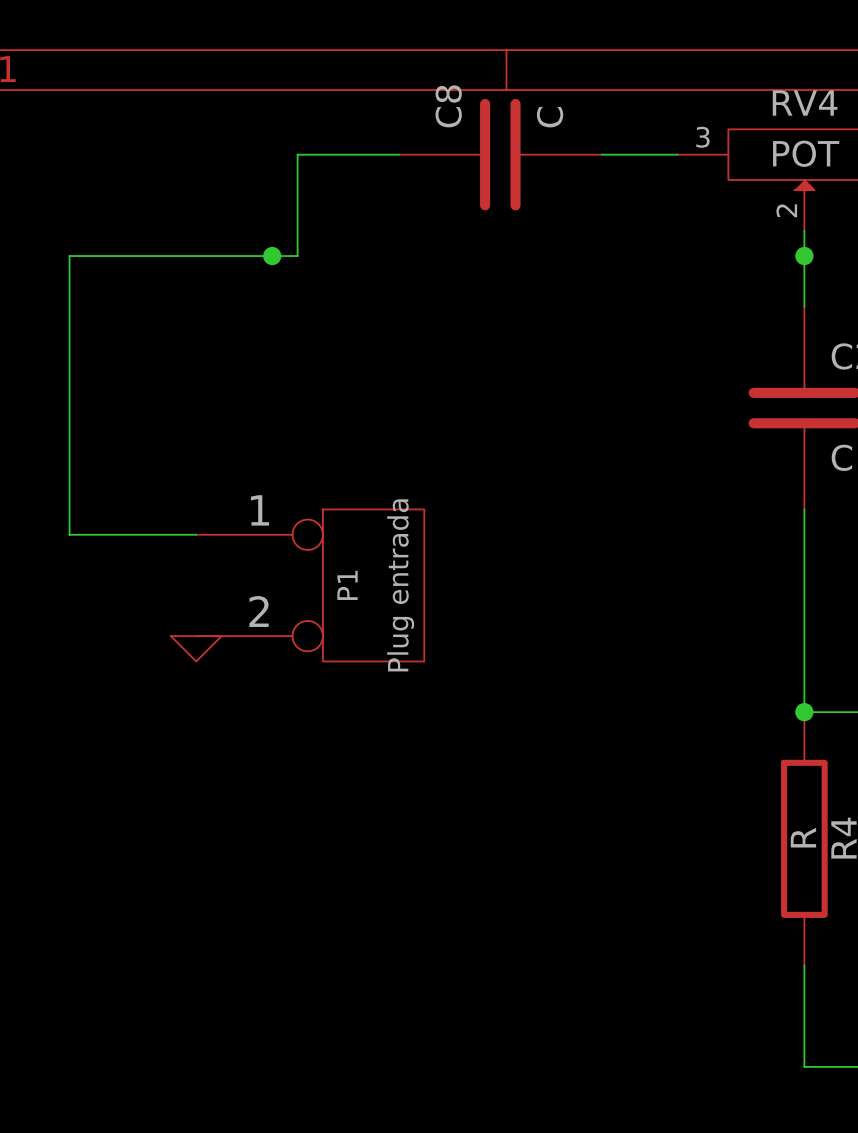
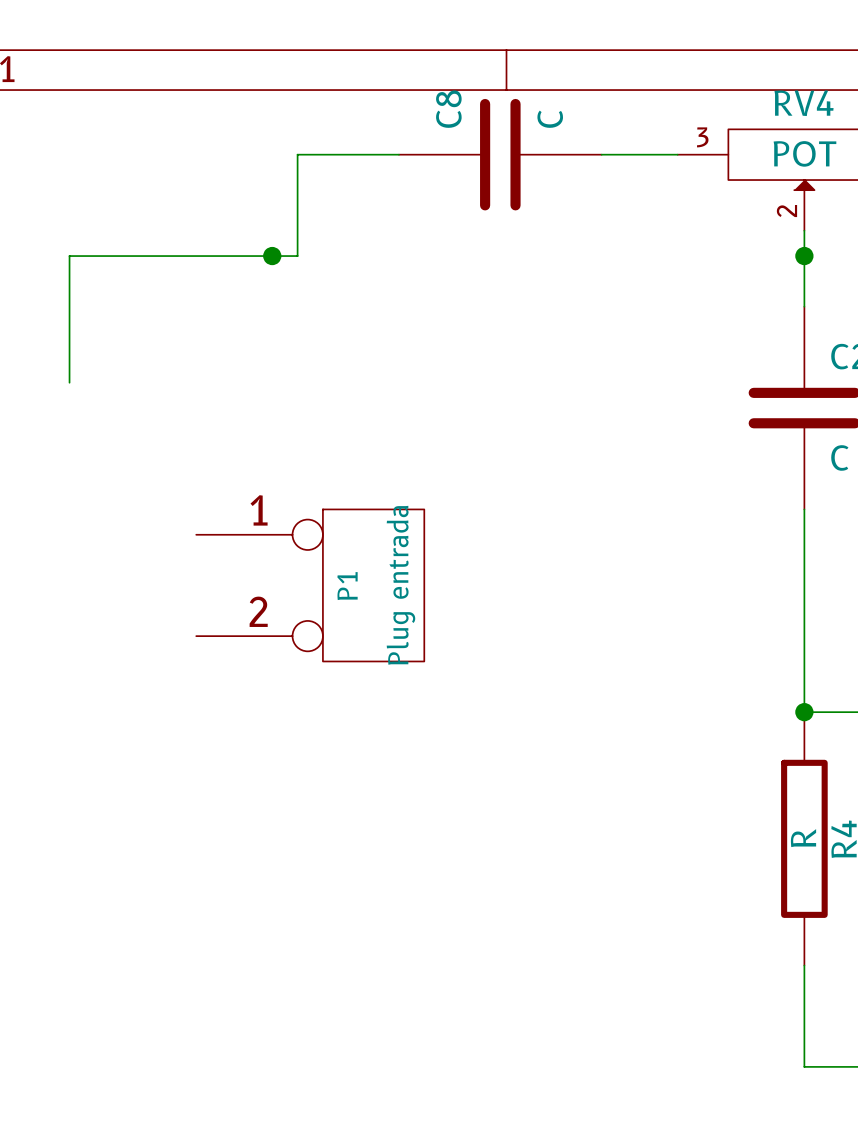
wire: (69, 382) (69, 534) (196, 534) -> none
power symbol: (196, 648) -> none

